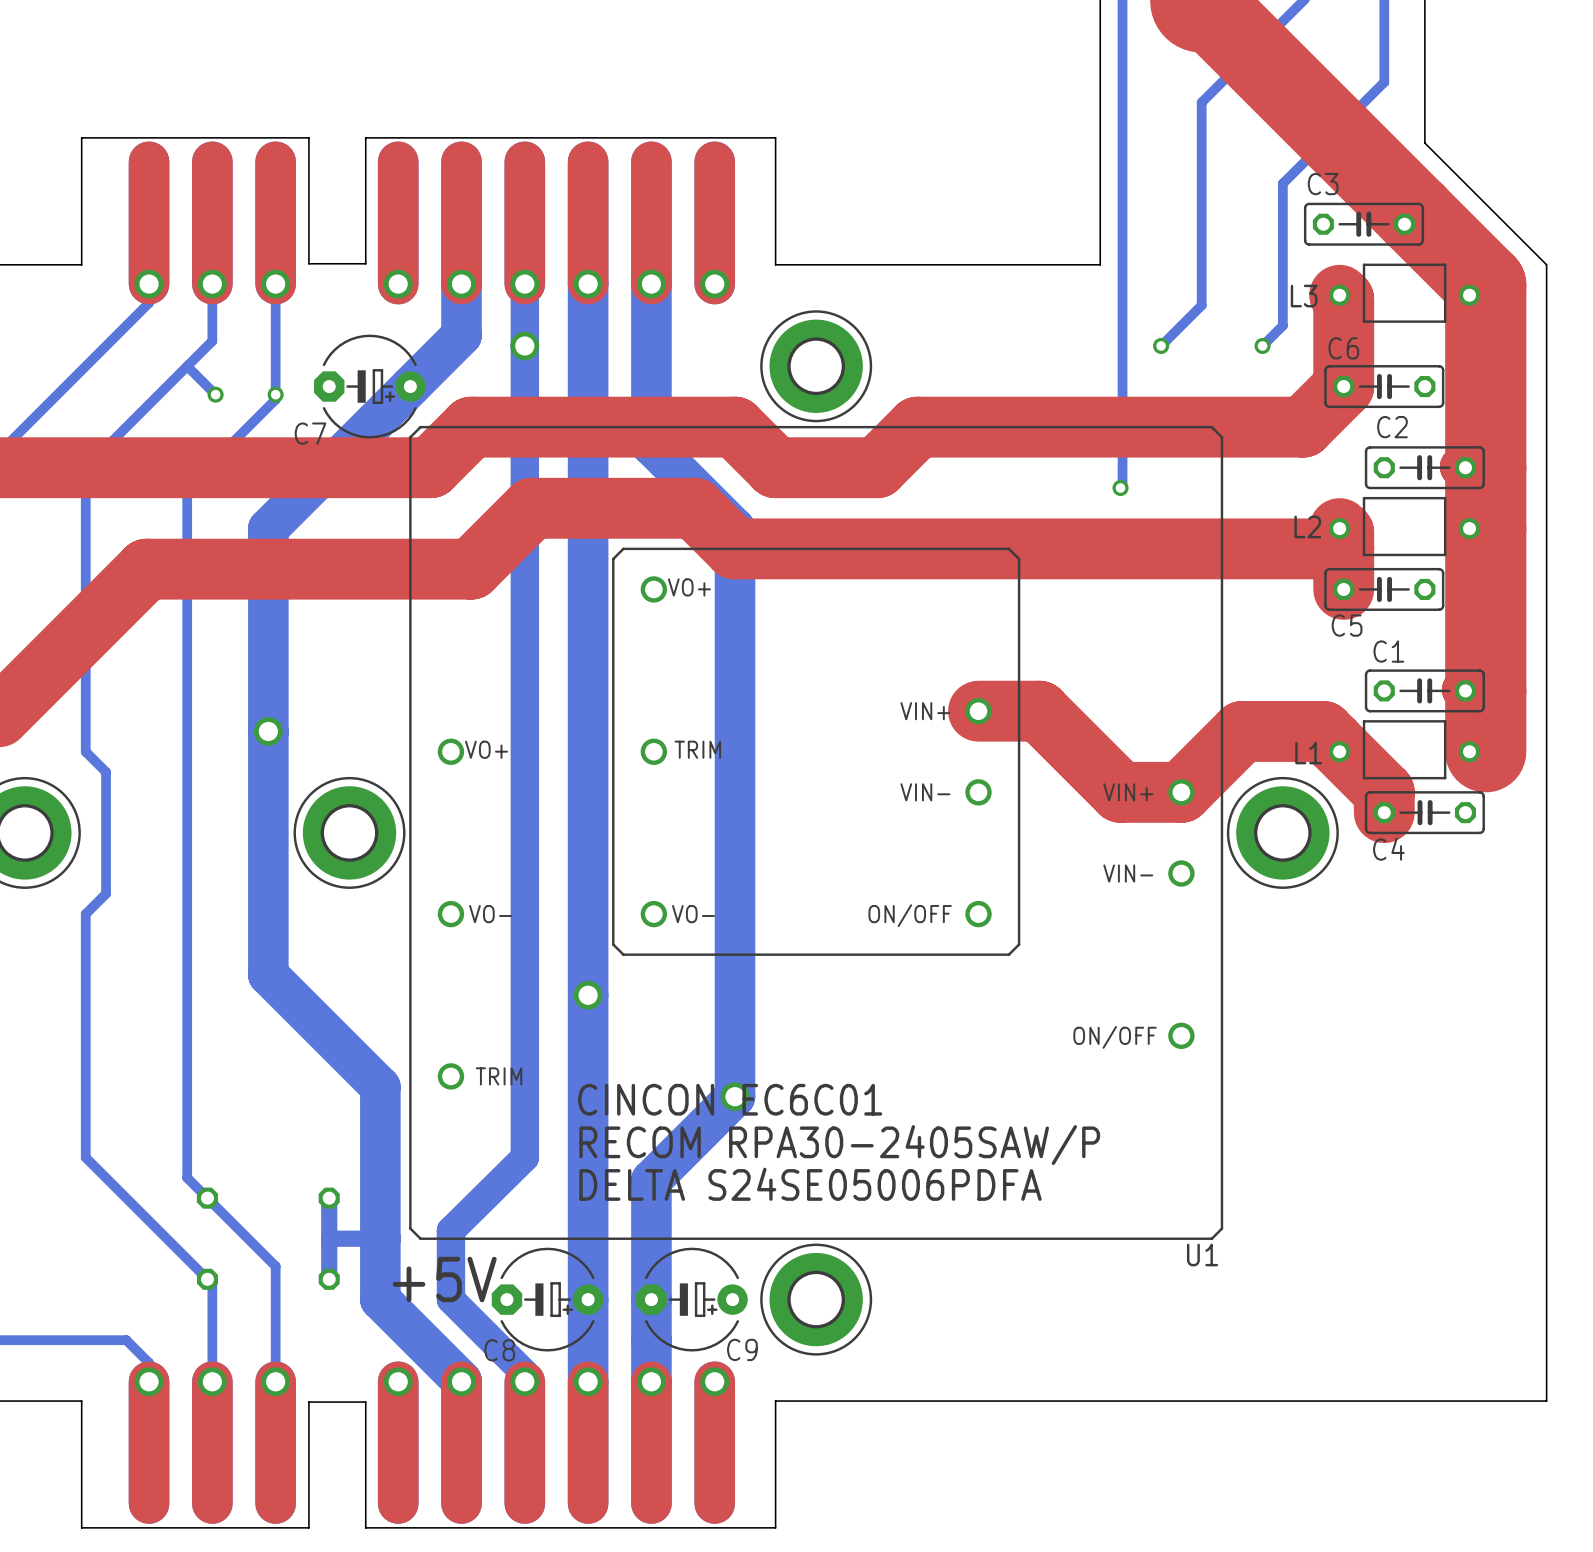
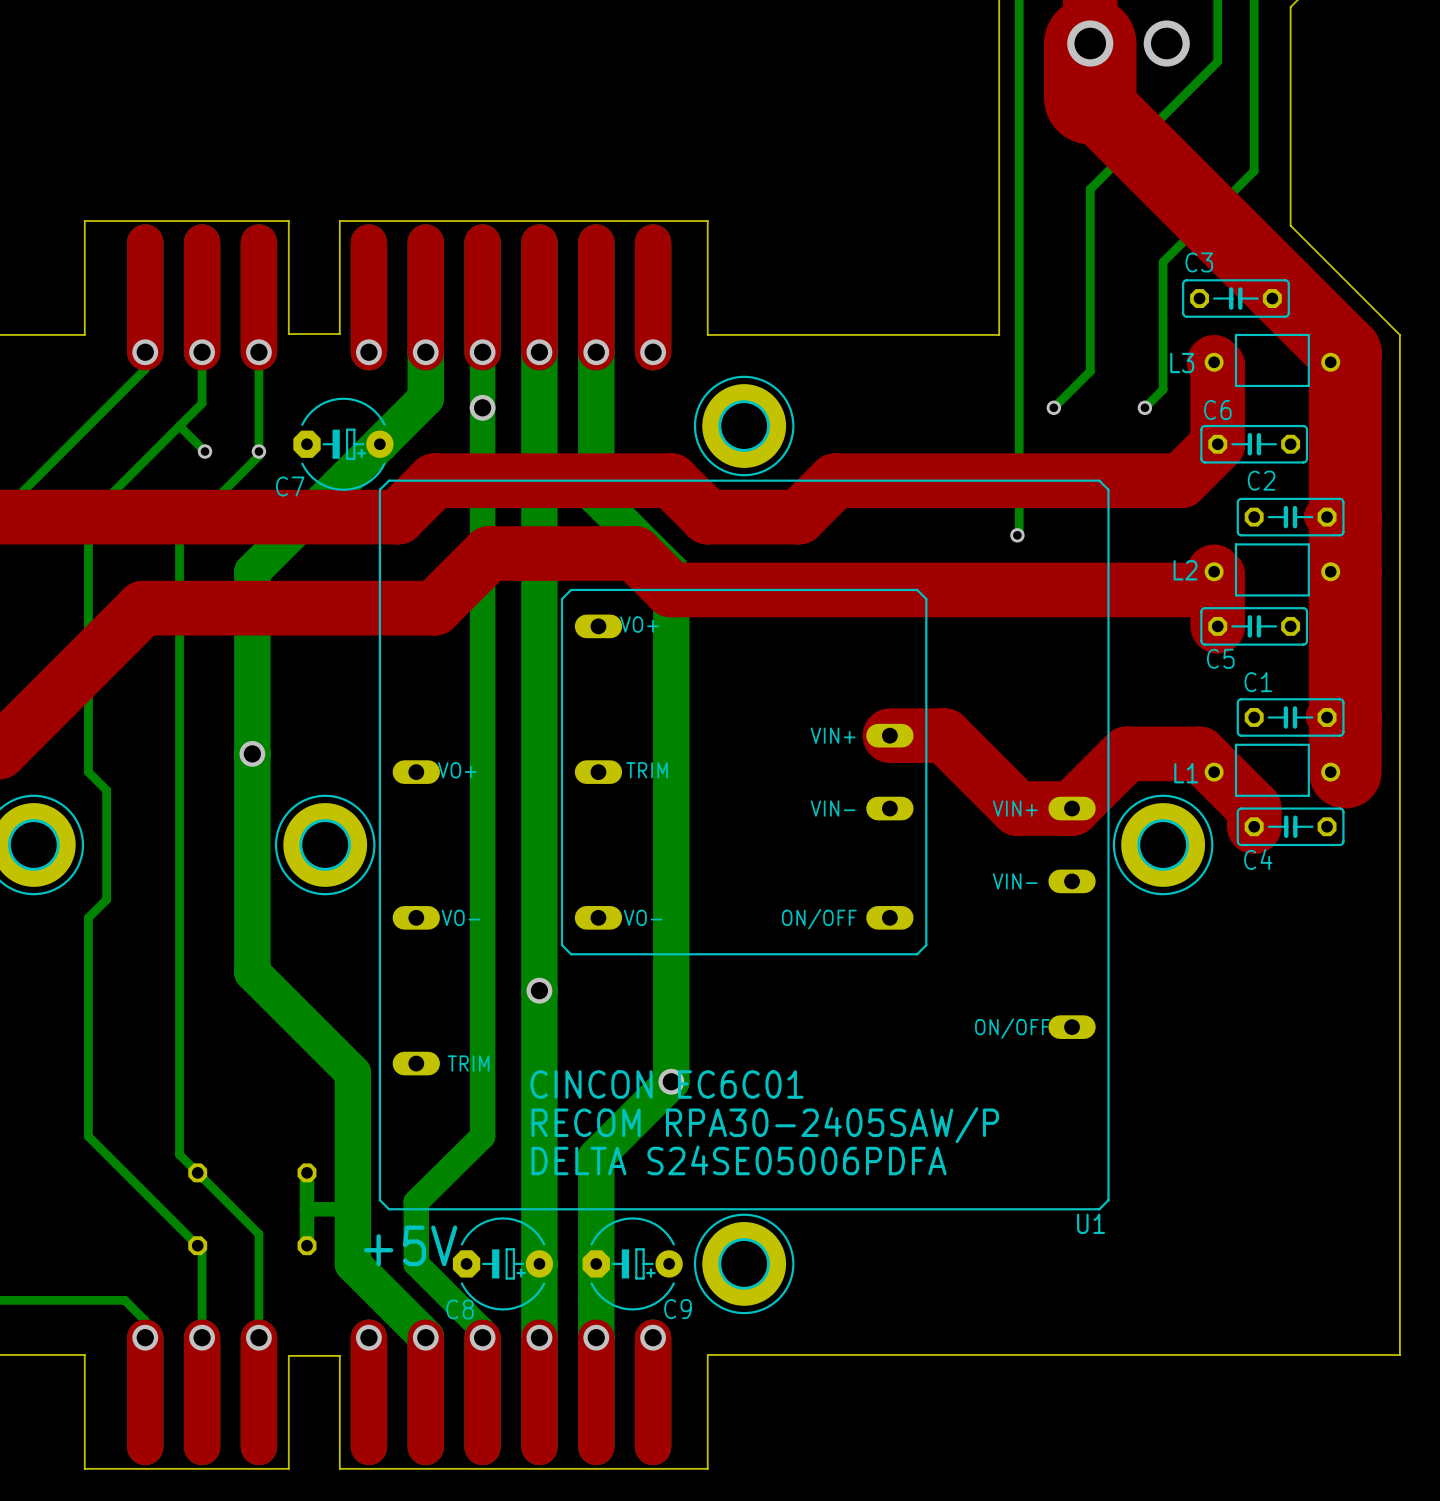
U1 footprint: [409, 425, 1224, 1240] -> [378, 479, 1110, 1211]

